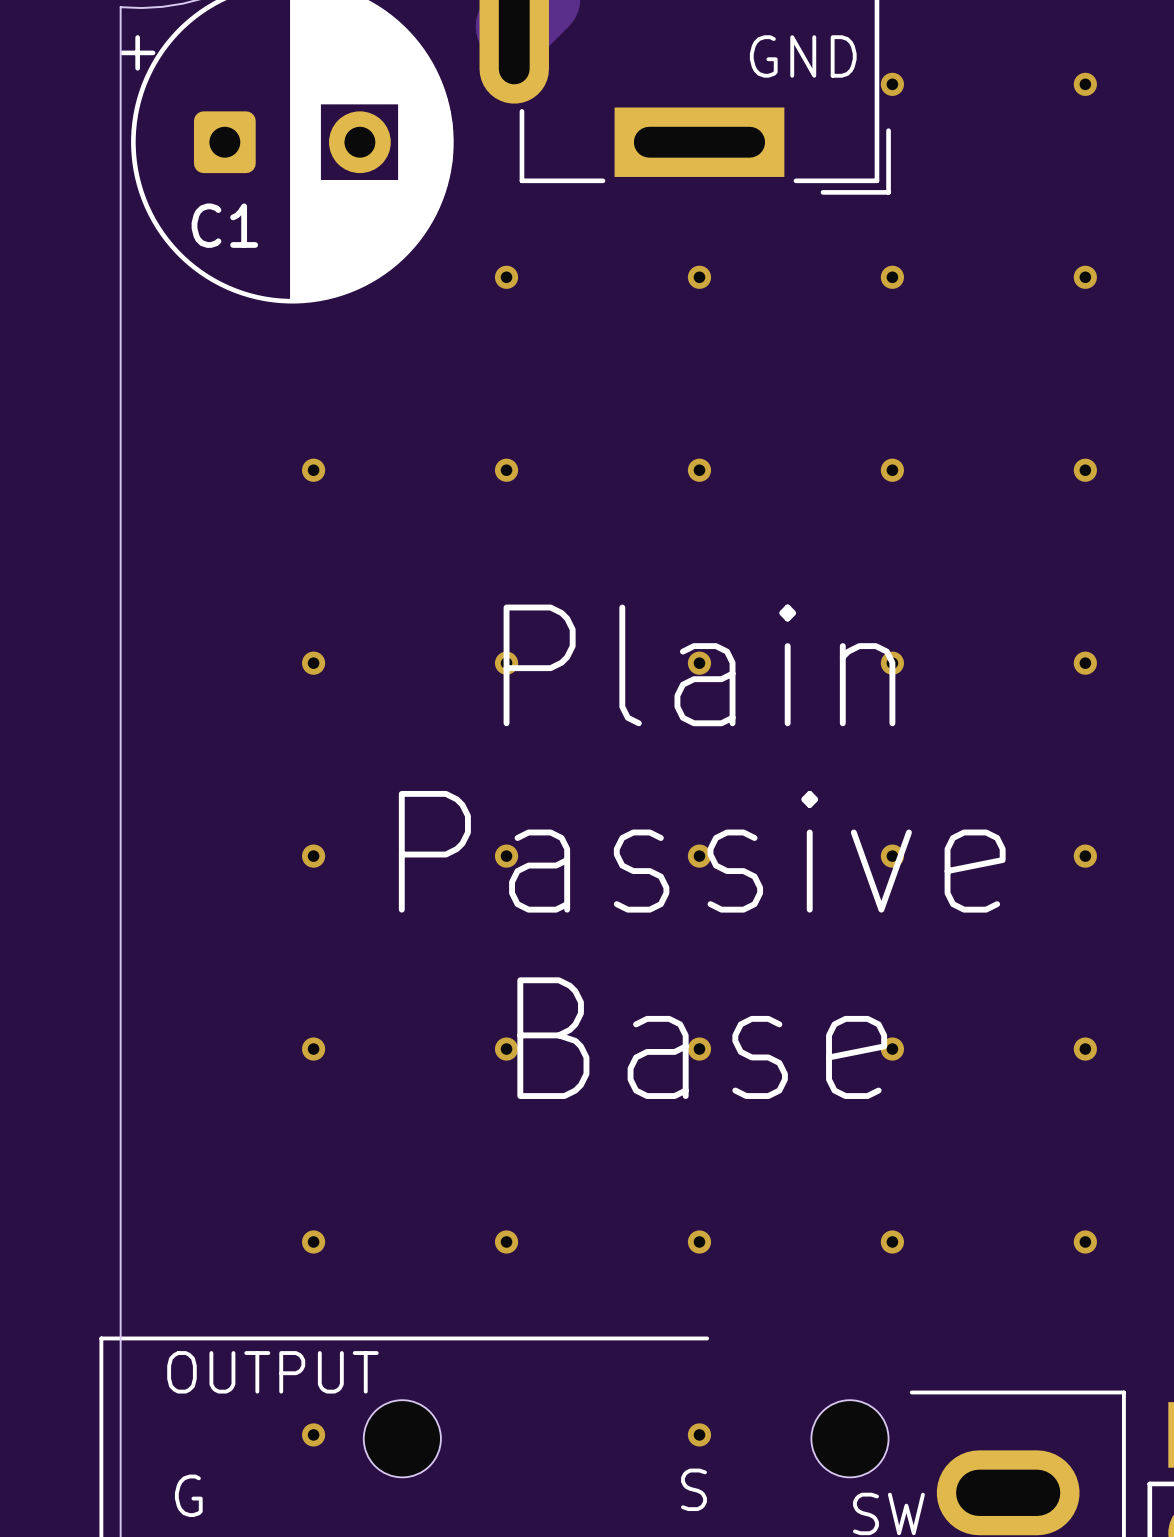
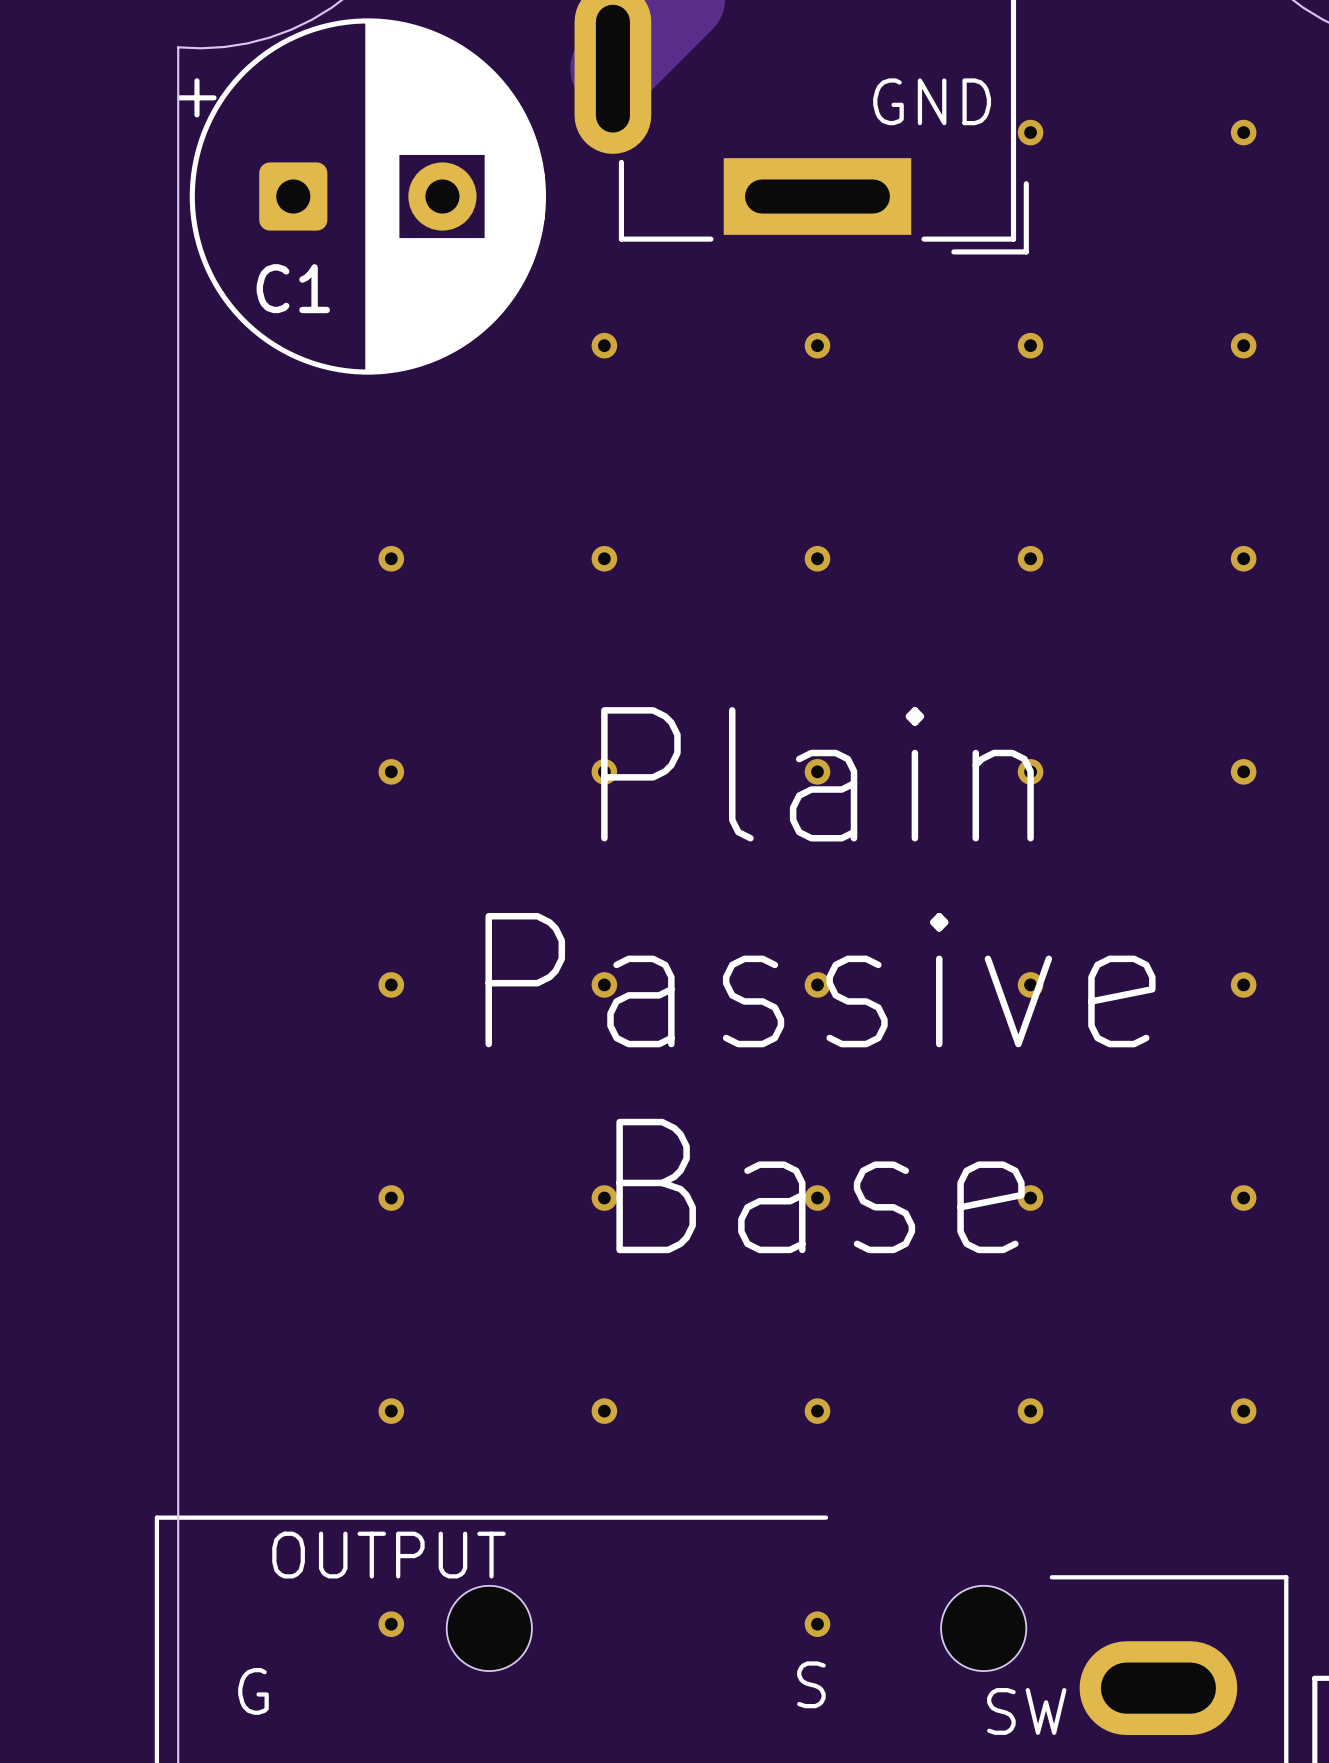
text position: OUTPUT (272, 1372) -> OUTPUT (389, 1555)

